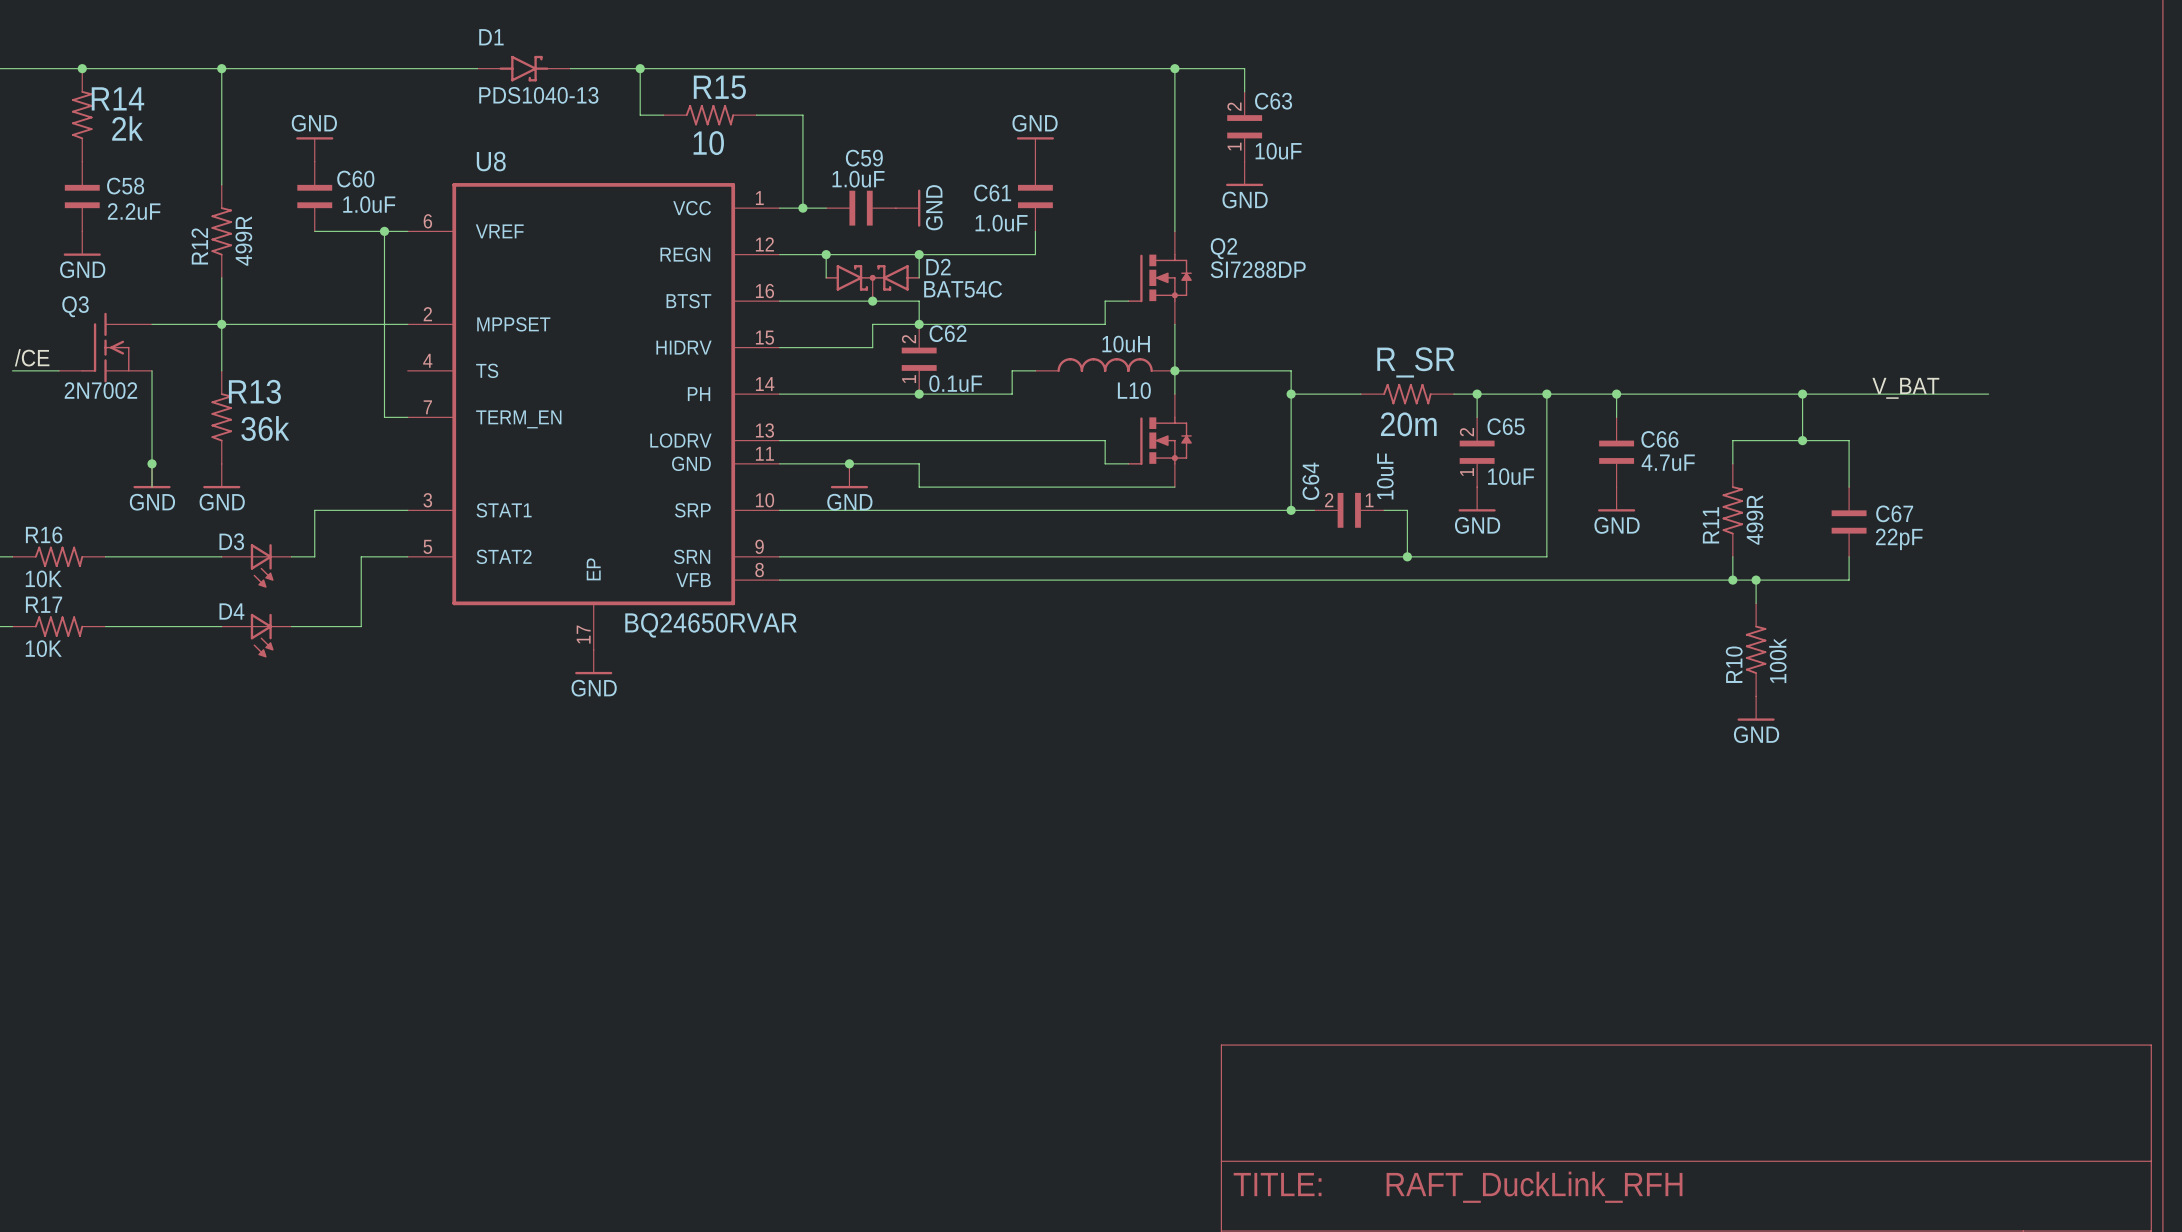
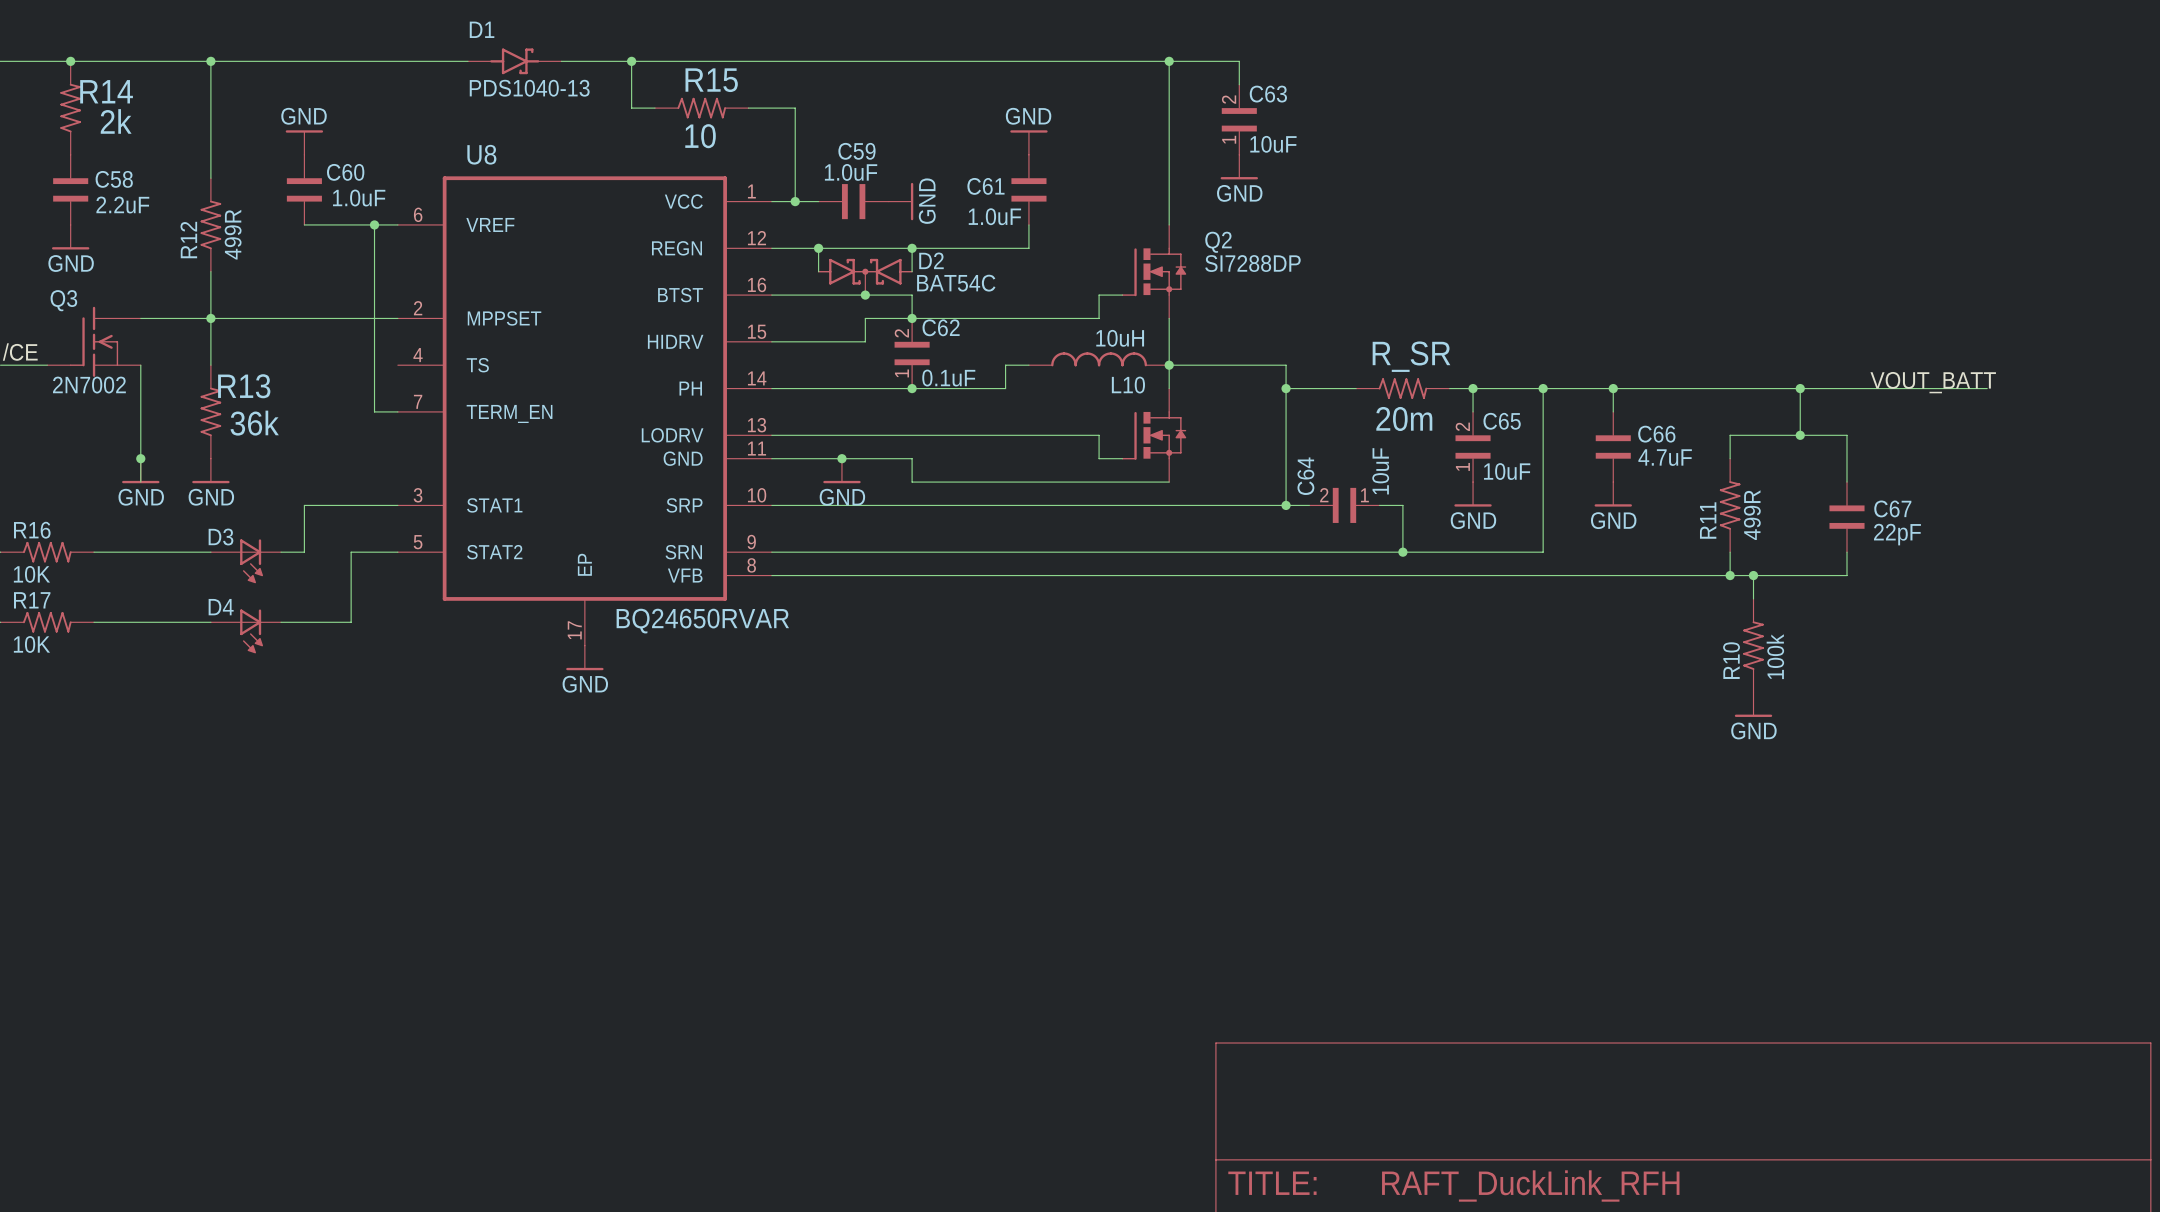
label: V_BAT (1905, 388) -> VOUT_BATT (1933, 382)

